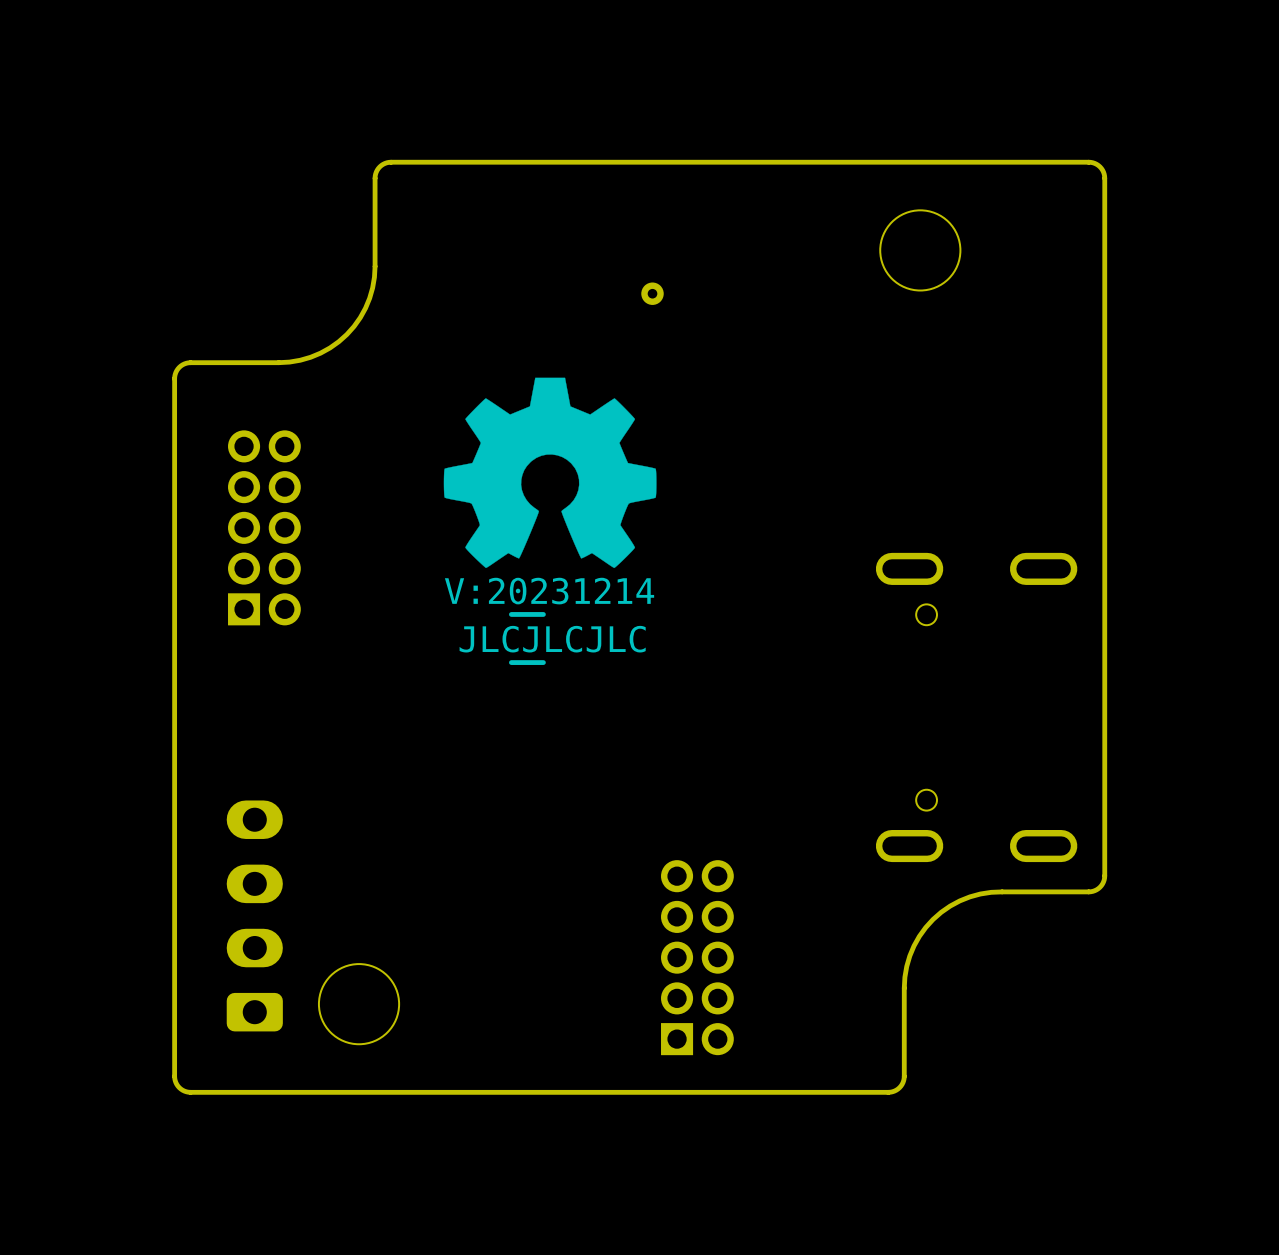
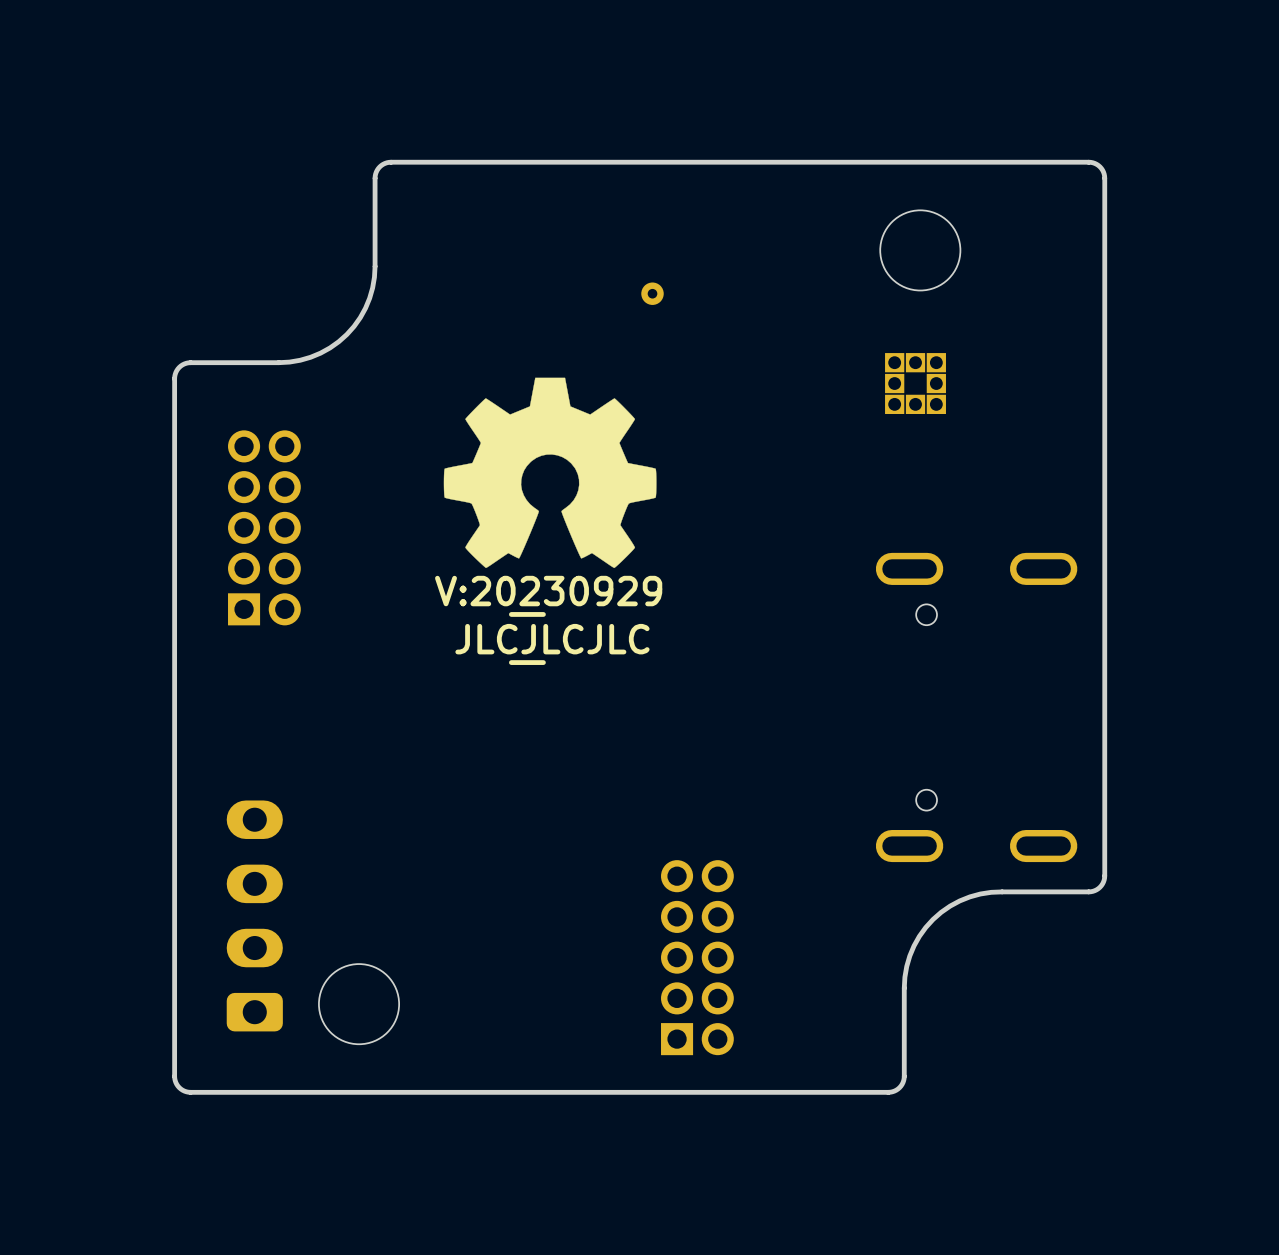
part: none -> (915, 383)
drawing shape: [444, 577, 655, 617] -> [435, 575, 663, 617]

